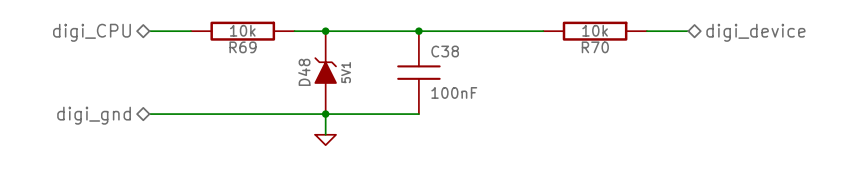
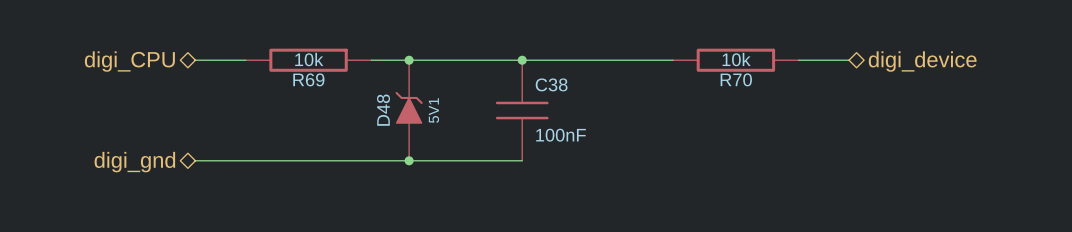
wire: (325, 114) (325, 134) -> none
power symbol: (325, 139) -> none

